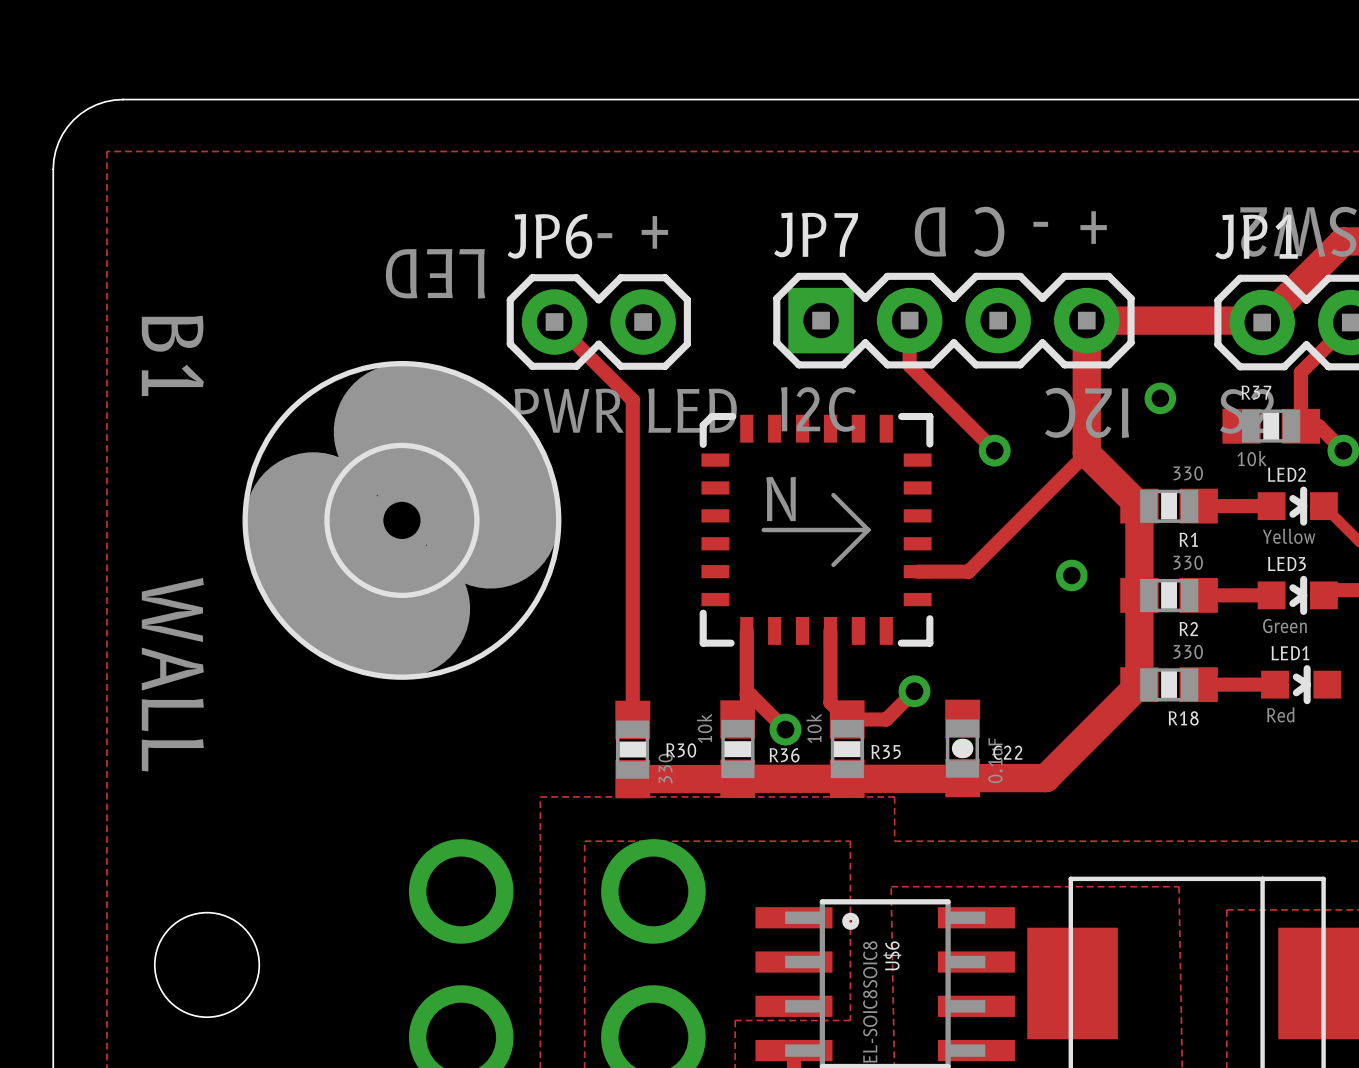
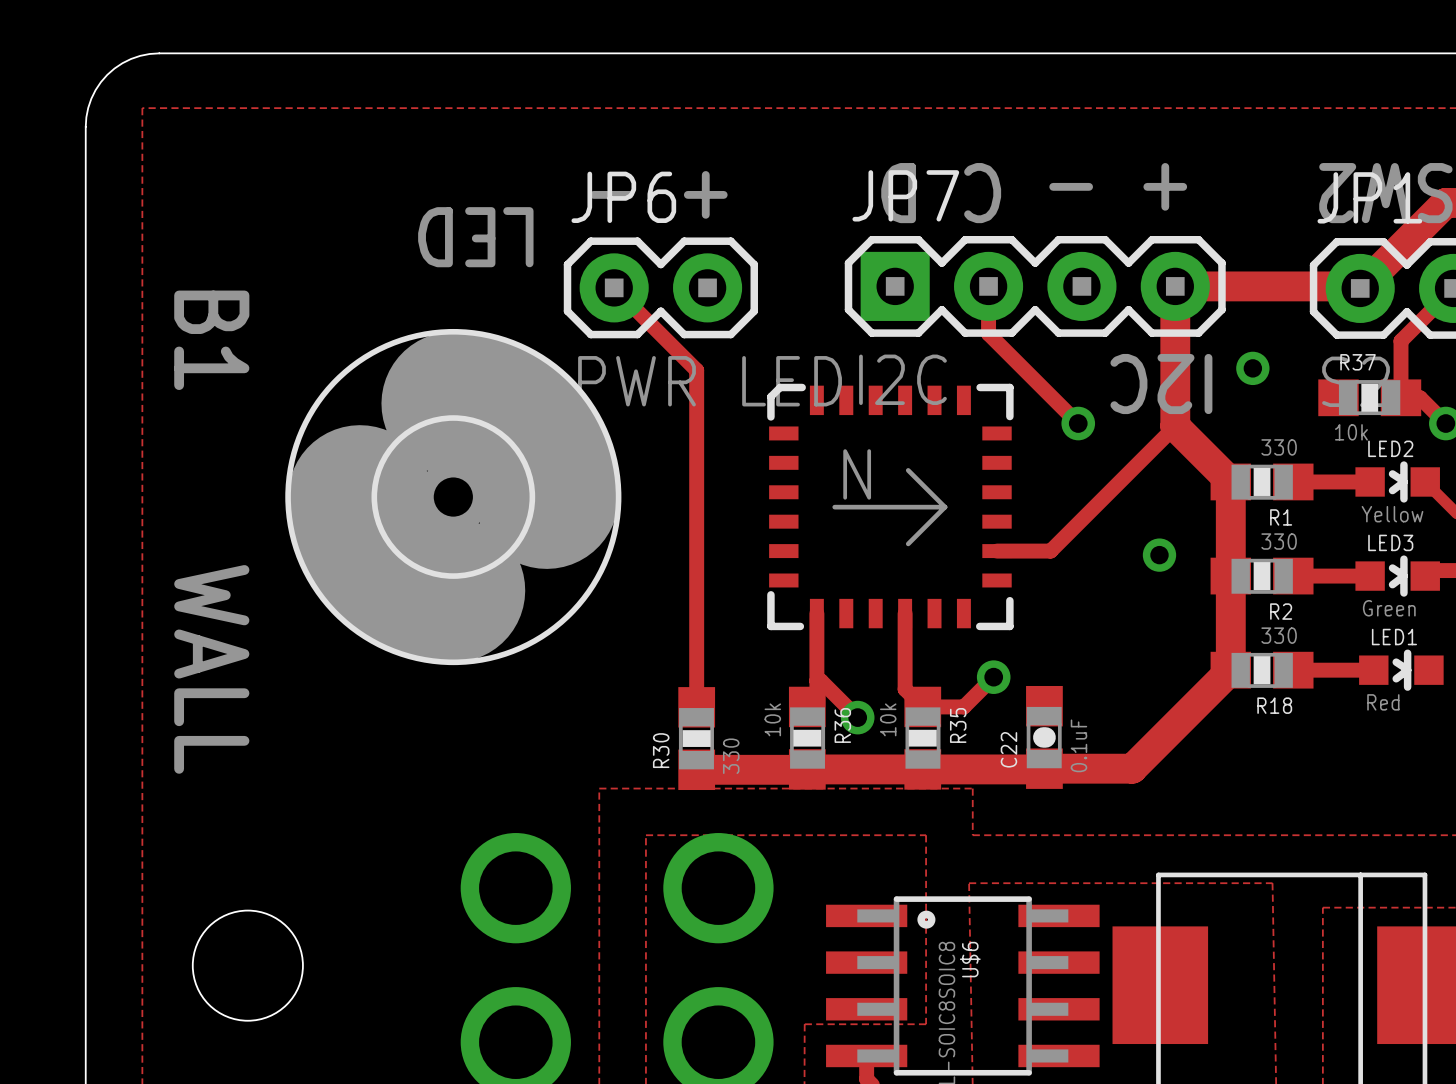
R30 name rotation: 0° (681, 750) -> 90° counterclockwise (661, 750)
R30 name position: R30 (681, 750) -> R30 (661, 750)
R35 name rotation: 0° (886, 752) -> 90° counterclockwise (958, 725)
C22 name rotation: 0° (1007, 752) -> 90° counterclockwise (1008, 749)
C22 name position: C22 (1007, 752) -> C22 (1008, 749)
R36 name rotation: 0° (784, 755) -> 90° counterclockwise (842, 725)

